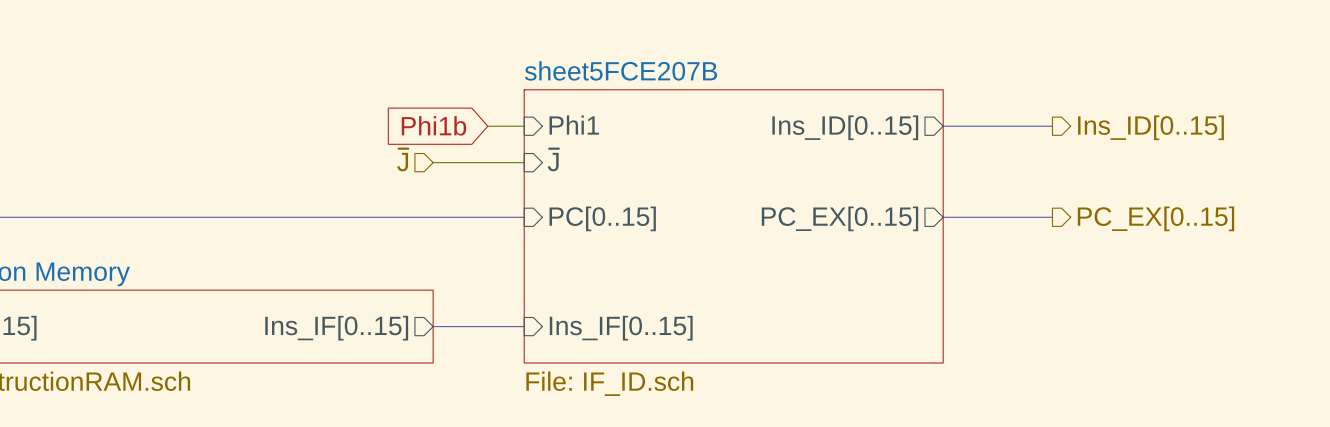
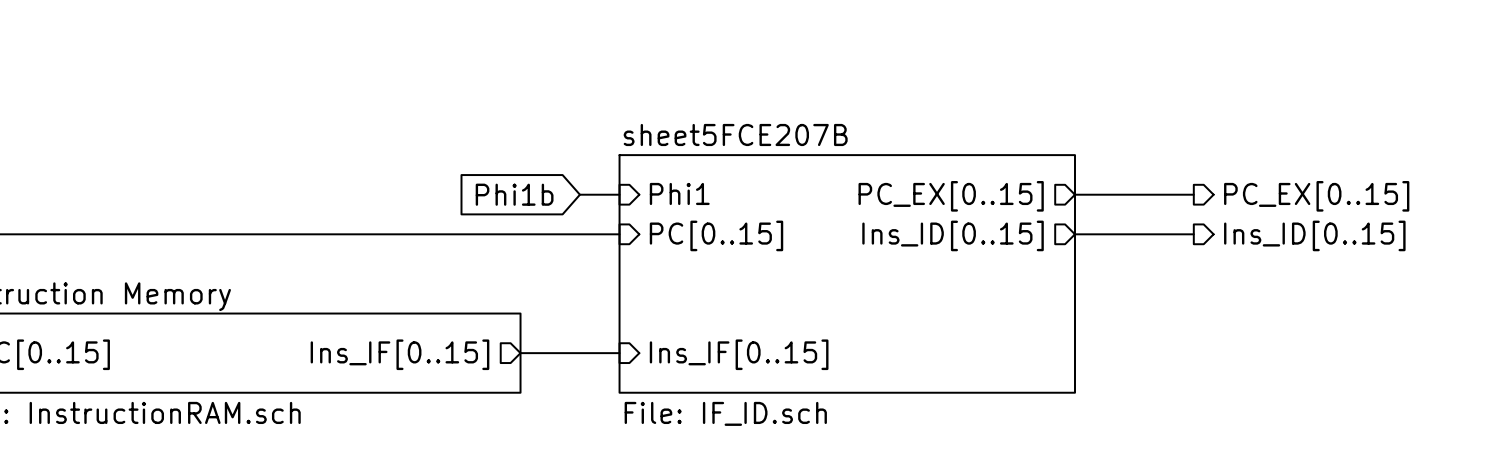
sheet sheet5FCE207B shape: [524, 89, 944, 364] -> [619, 155, 1076, 393]
global label position: Phi1b (433, 125) -> Phi1b (514, 194)
sheet pin position: Phi1 (574, 125) -> Phi1 (679, 193)
wire: (487, 126) (524, 126) -> (579, 194) (619, 194)
bus: (943, 126) (1052, 126) -> (1075, 194) (1193, 194)
sheet pin: Ins_ID[0..15] (845, 127) -> none
hierarchical label: Ins_ID[0..15] (1150, 127) -> none
hierarchical label: ~{J} (402, 160) -> none
sheet pin: ~{J} (553, 160) -> none
wire: (433, 162) (524, 162) -> none
sheet pin: none -> PC_EX[0..15] (951, 196)
hierarchical label: none -> PC_EX[0..15] (1316, 196)
sheet pin: PC_EX[0..15] (839, 218) -> Ins_ID[0..15] (953, 235)
hierarchical label: PC_EX[0..15] (1155, 218) -> Ins_ID[0..15] (1314, 235)

